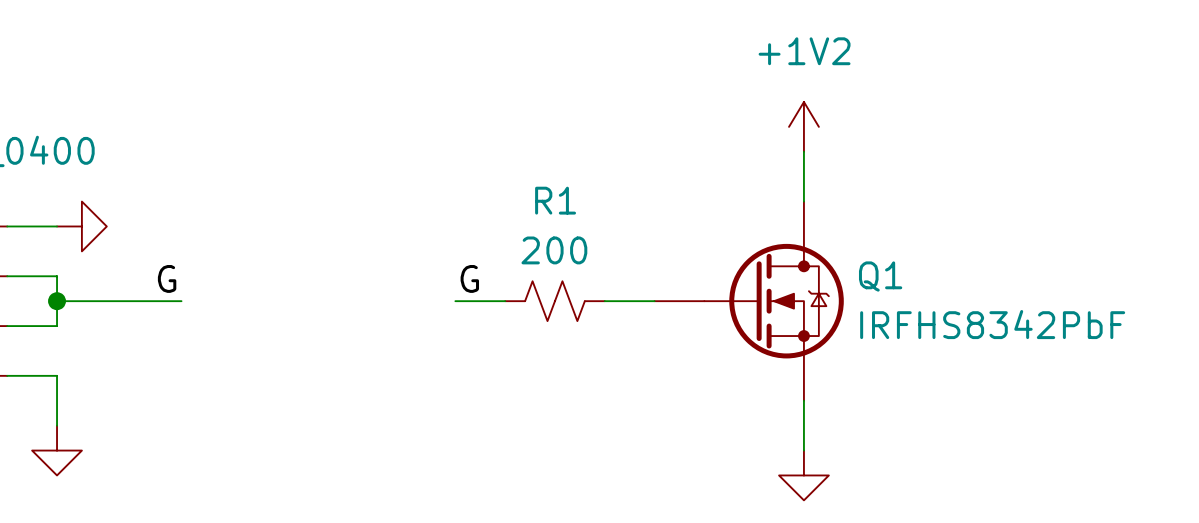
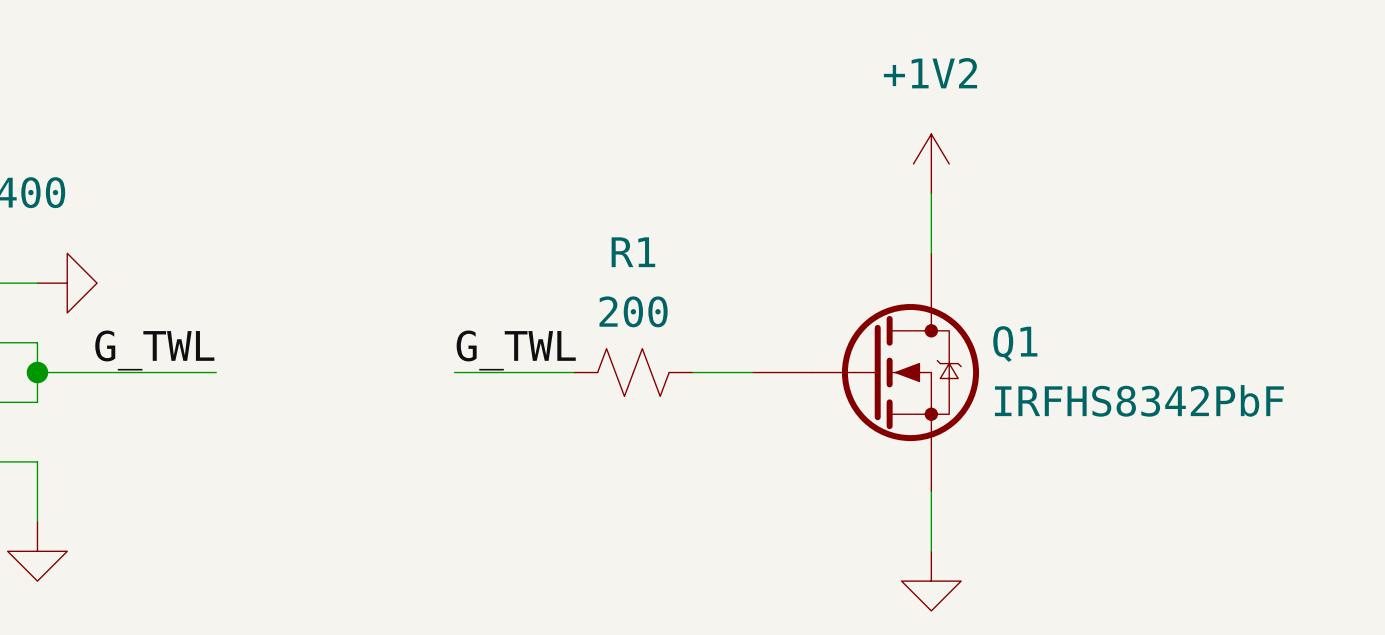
label: G (167, 278) -> none
label: G (469, 278) -> none
label: none -> G_TWL (154, 350)
label: none -> G_TWL (516, 350)
wire: none -> (186, 372) (216, 372)
wire: none -> (454, 372) (514, 372)

